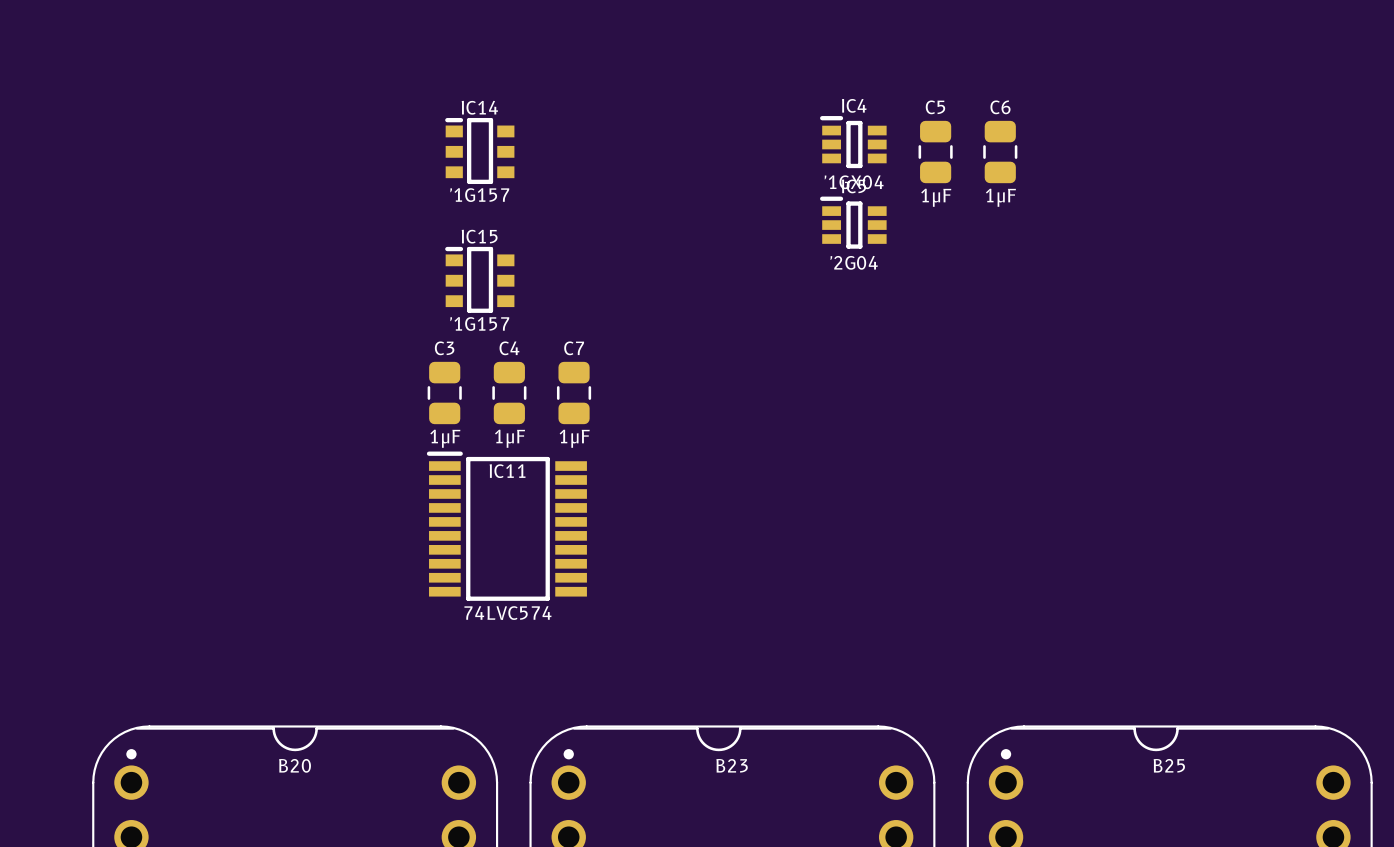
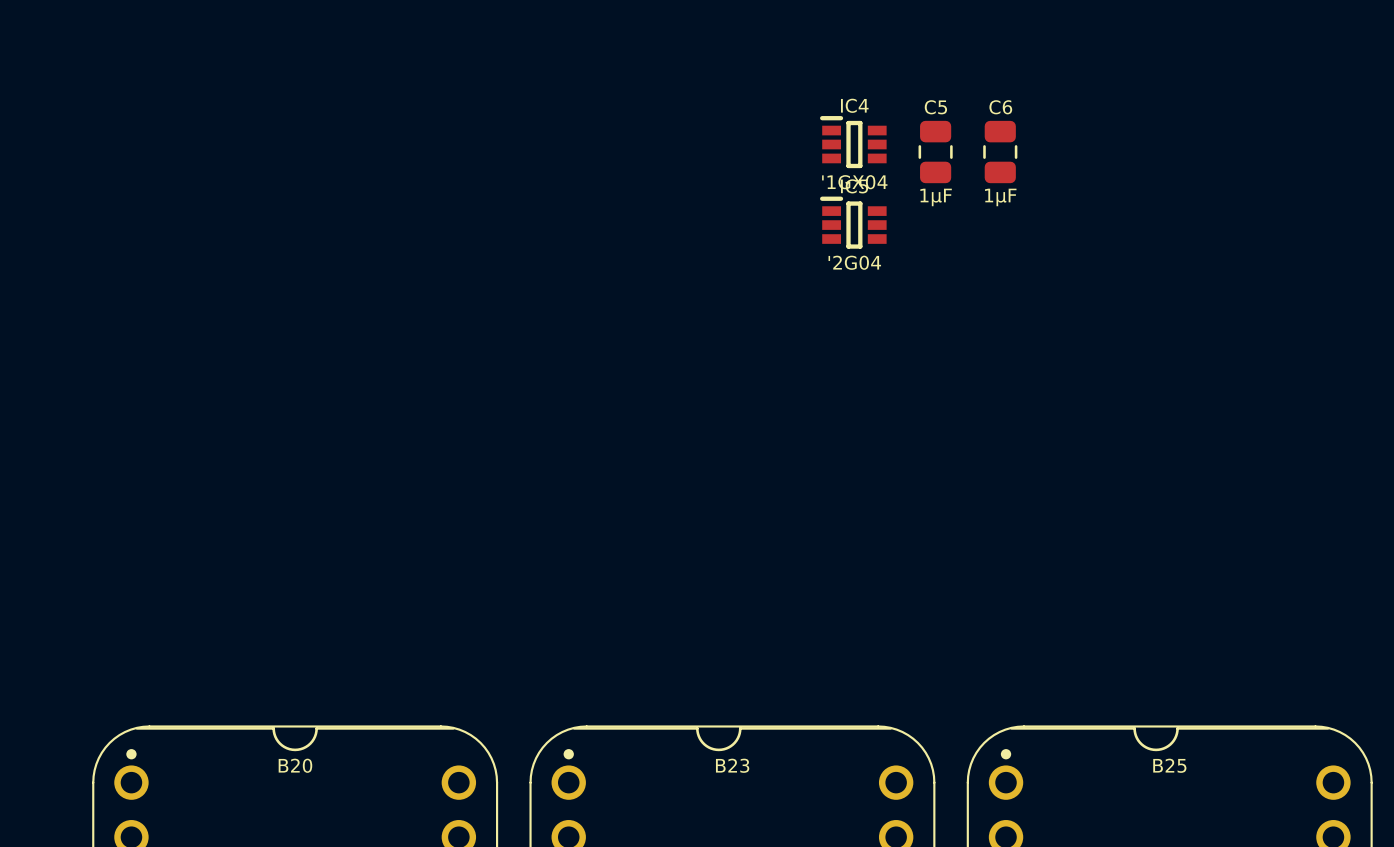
IC14: (479, 150) -> none
IC15: (479, 279) -> none
C3: 1μF (444, 393) -> none
C4: 1μF (509, 393) -> none
C7: 1μF (574, 393) -> none
IC11: (506, 526) -> none

